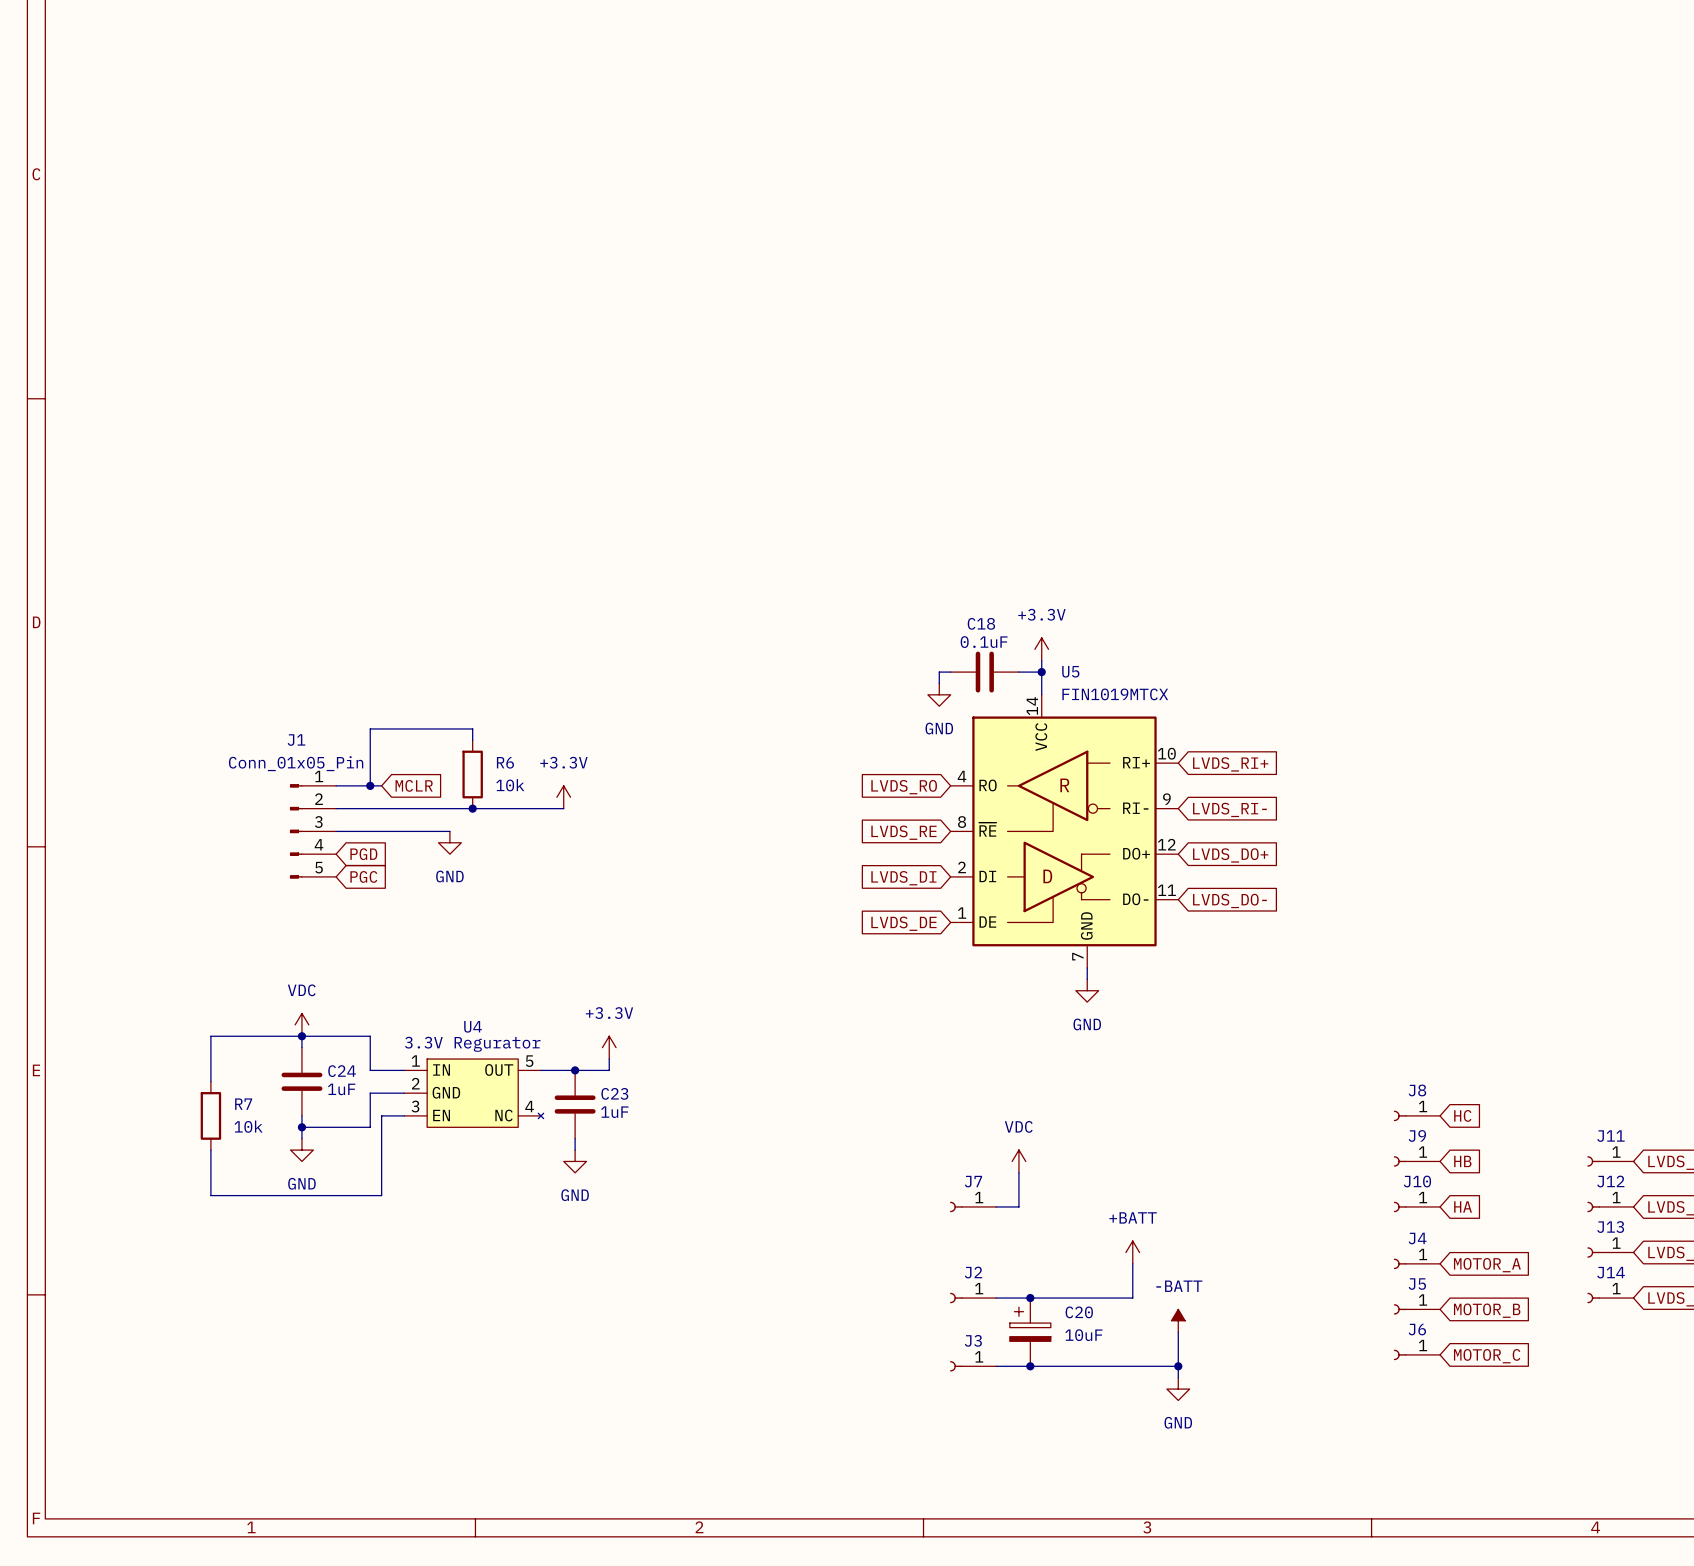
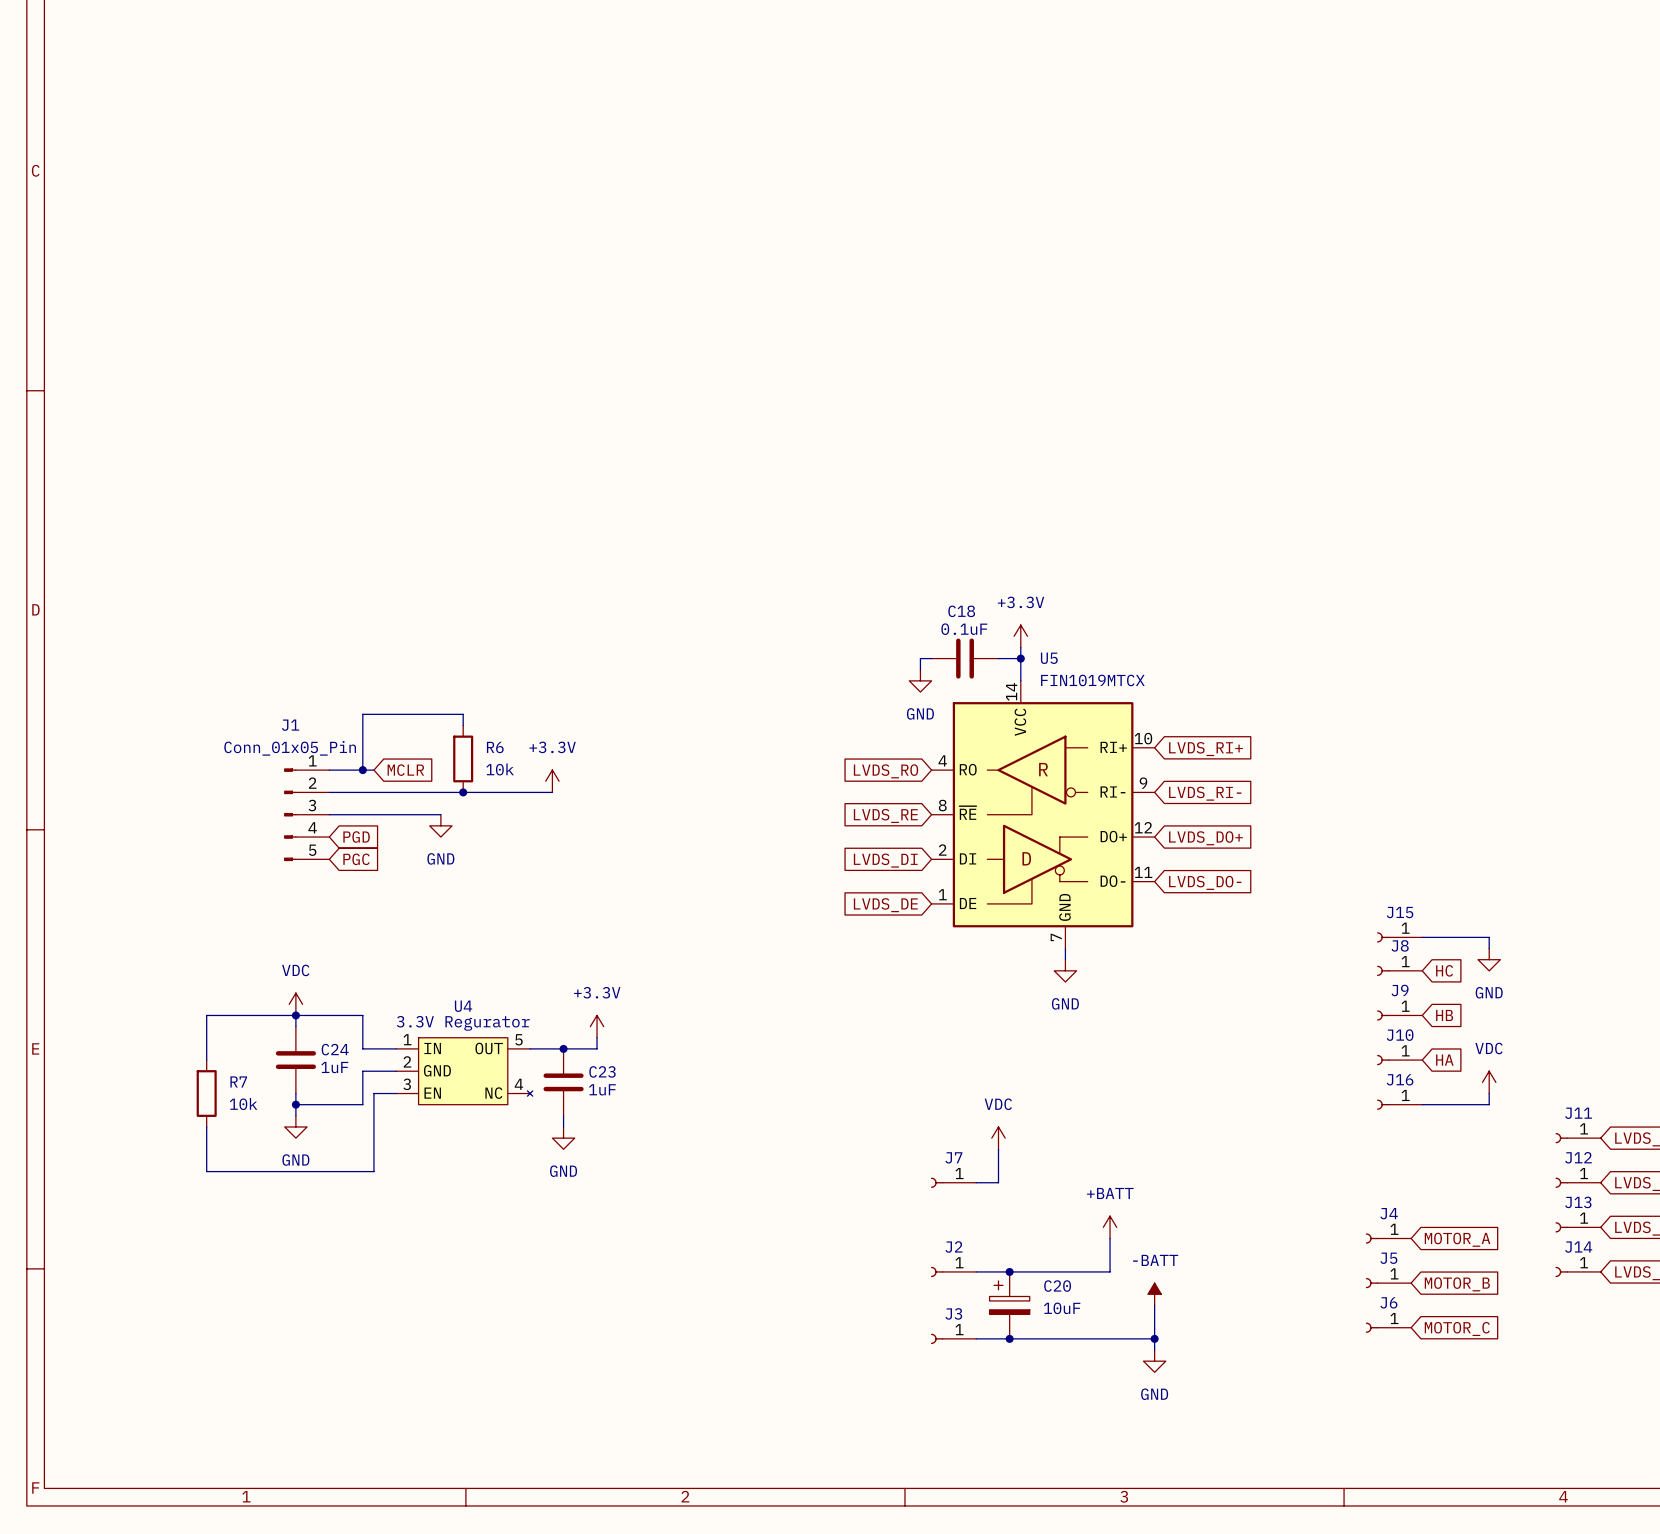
J15: none -> (1399, 937)
wire: none -> (1422, 937) (1489, 937) (1489, 948)
power symbol: none -> GND (1489, 959)
power symbol: none -> VDC (1489, 1082)
J8 position: (1416, 1115) -> (1399, 970)
global label position: HC (1462, 1115) -> HC (1444, 970)
wire: none -> (1489, 1093) (1489, 1104) (1422, 1104)
J16: none -> (1399, 1104)
J9 position: (1416, 1161) -> (1399, 1015)
global label position: HB (1462, 1161) -> HB (1444, 1015)
J10 position: (1416, 1206) -> (1399, 1060)
global label position: HA (1463, 1206) -> HA (1444, 1060)

